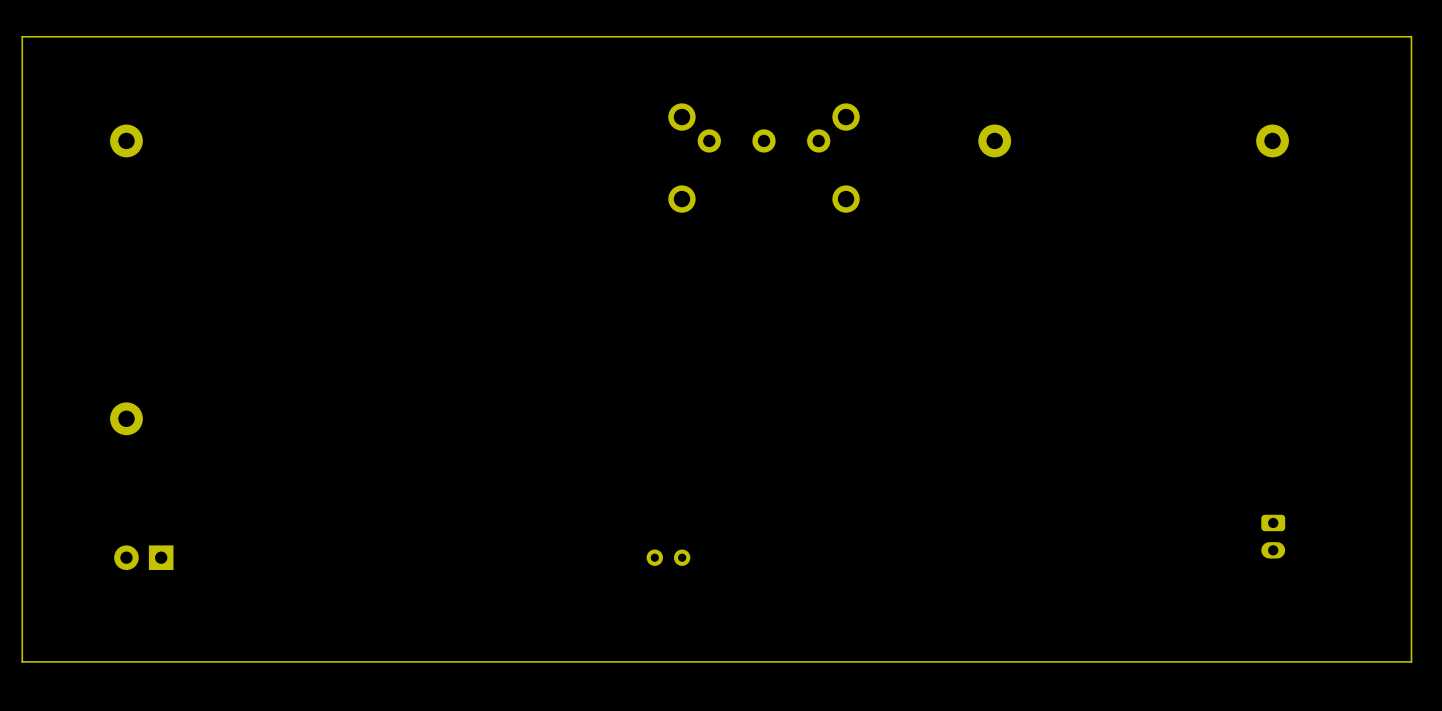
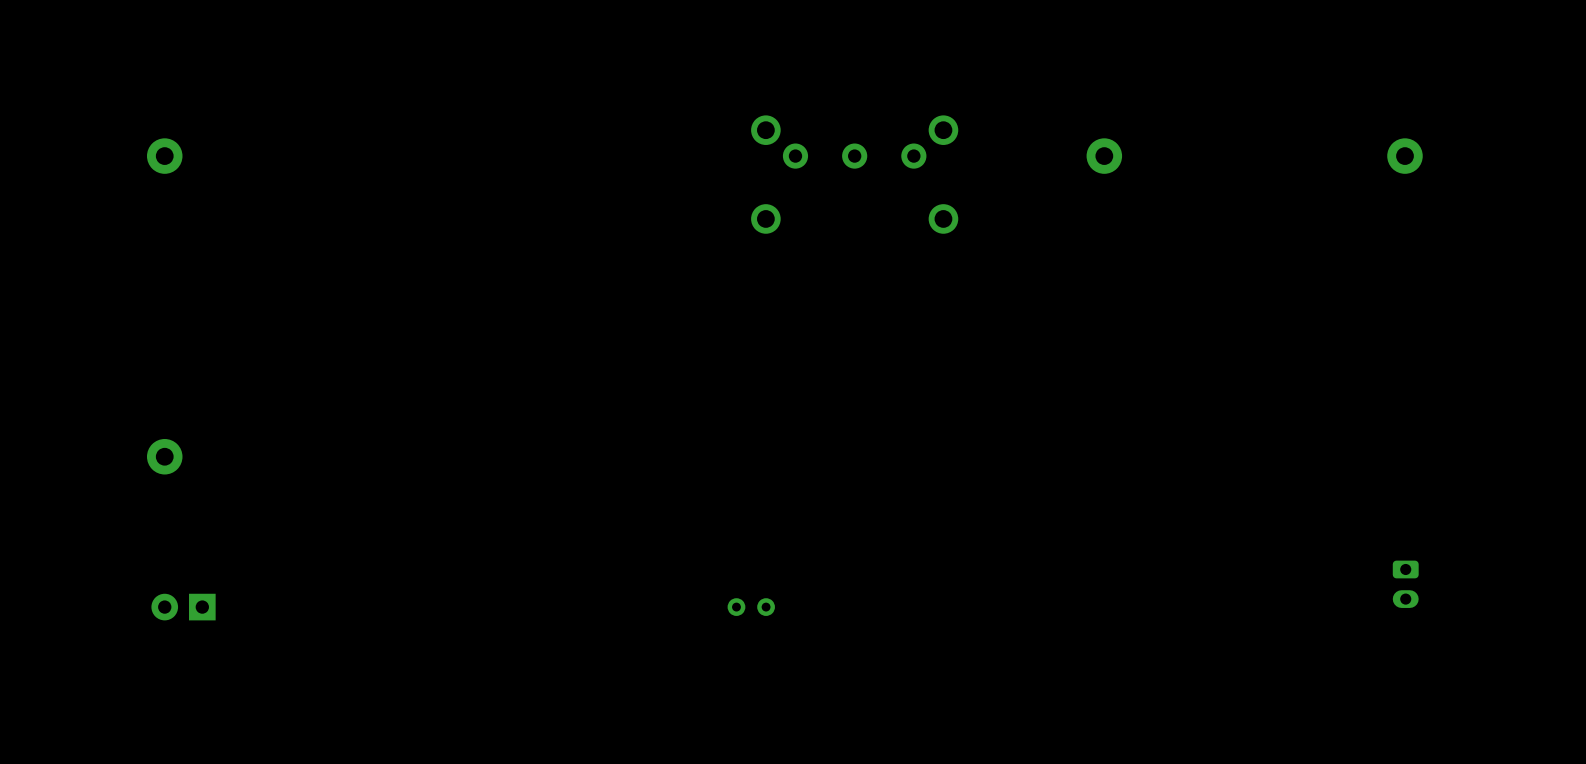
board edge: (1411, 36) (22, 36) (22, 661) (1411, 661) (1411, 36) -> none

